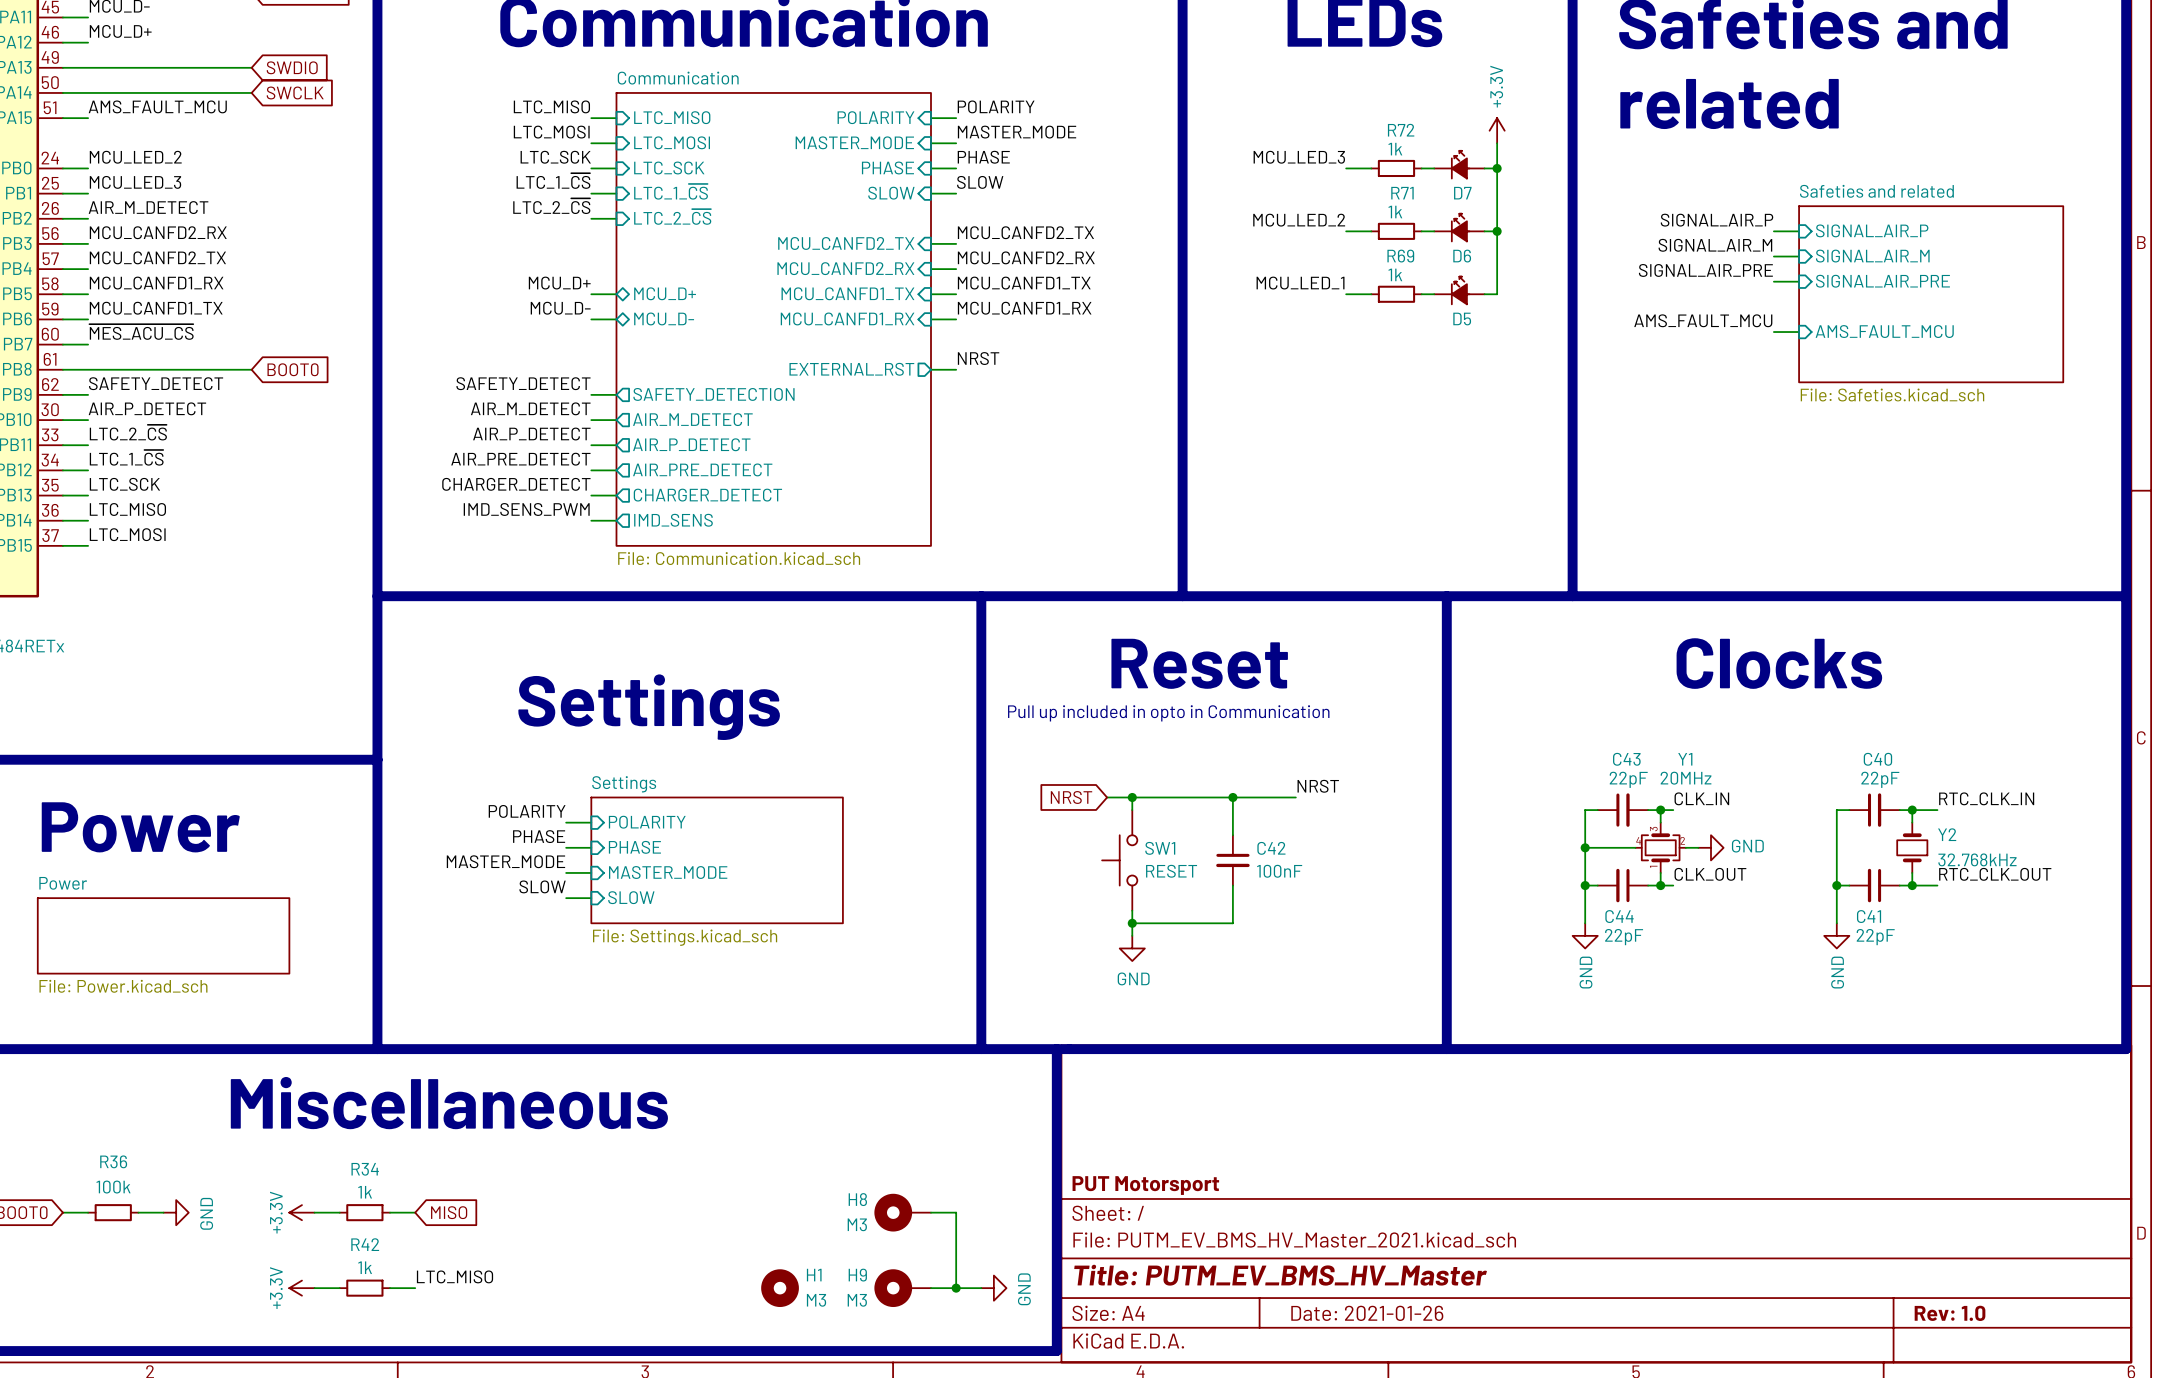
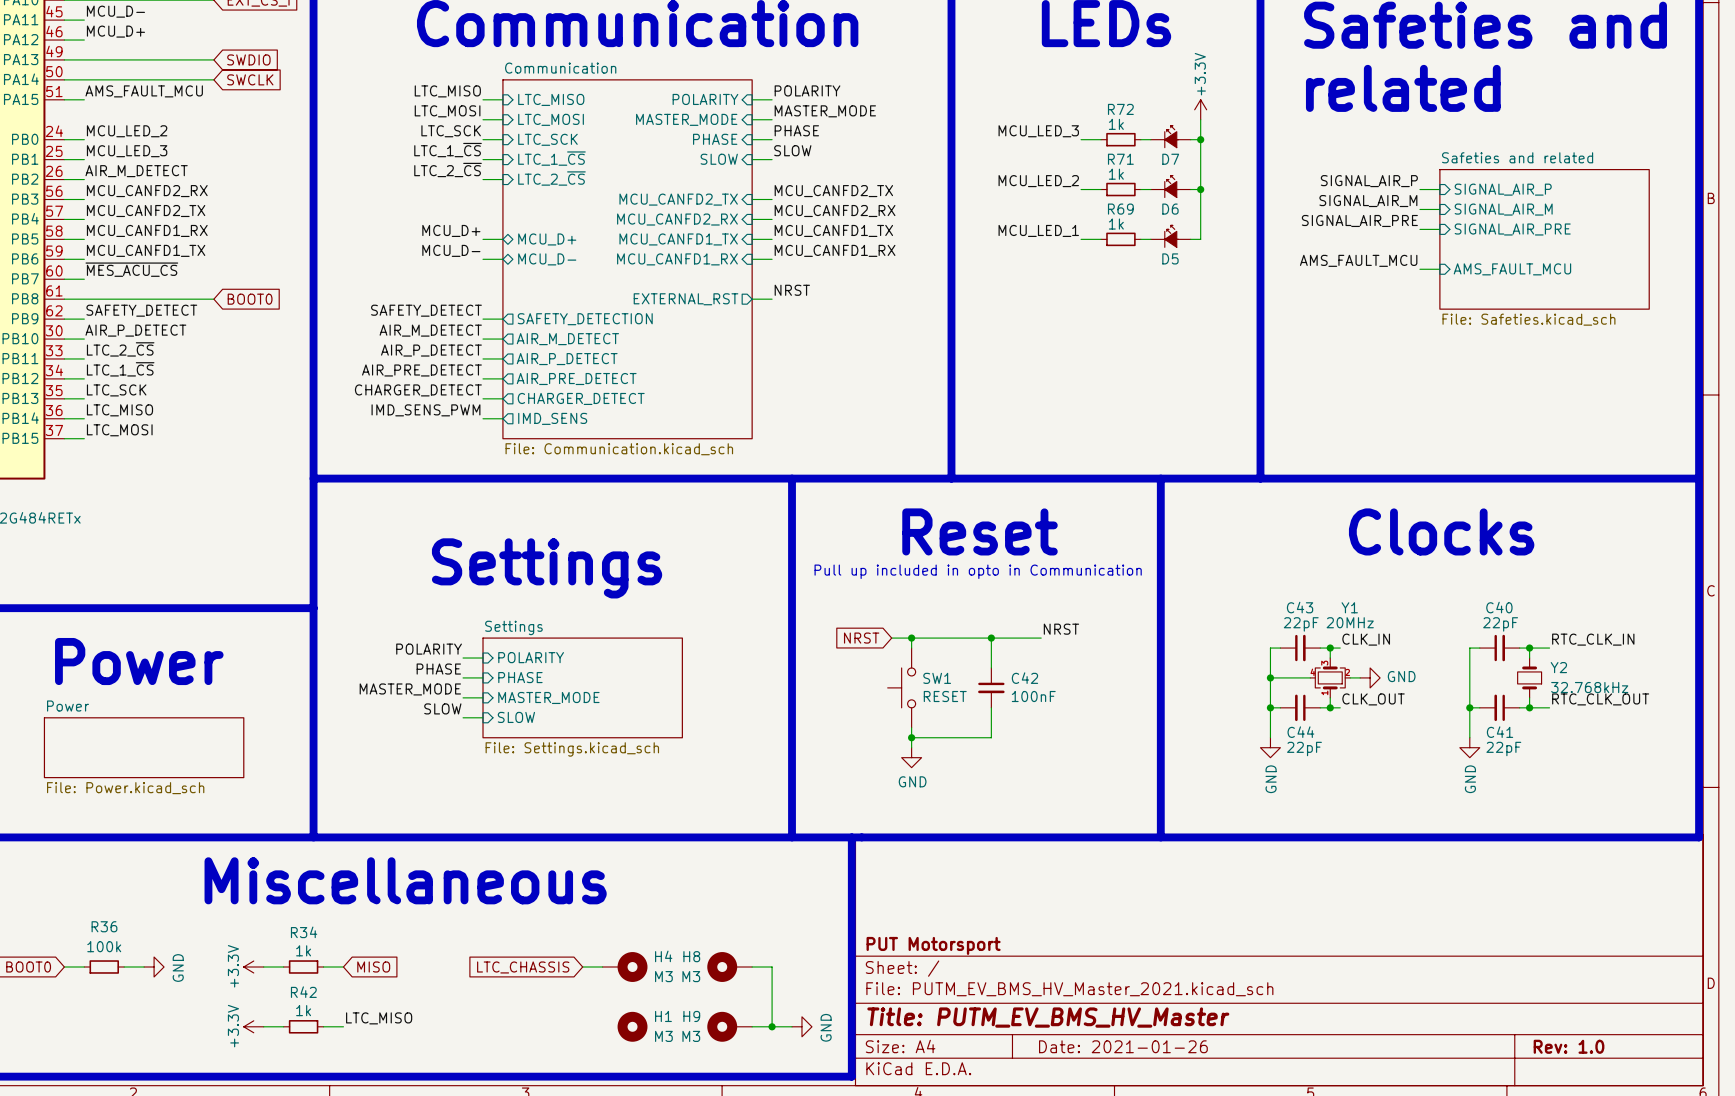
global label: none -> LTC_CHASSIS (523, 967)
wire: none -> (582, 967) (602, 967)
H4: none -> M3 (625, 967)

